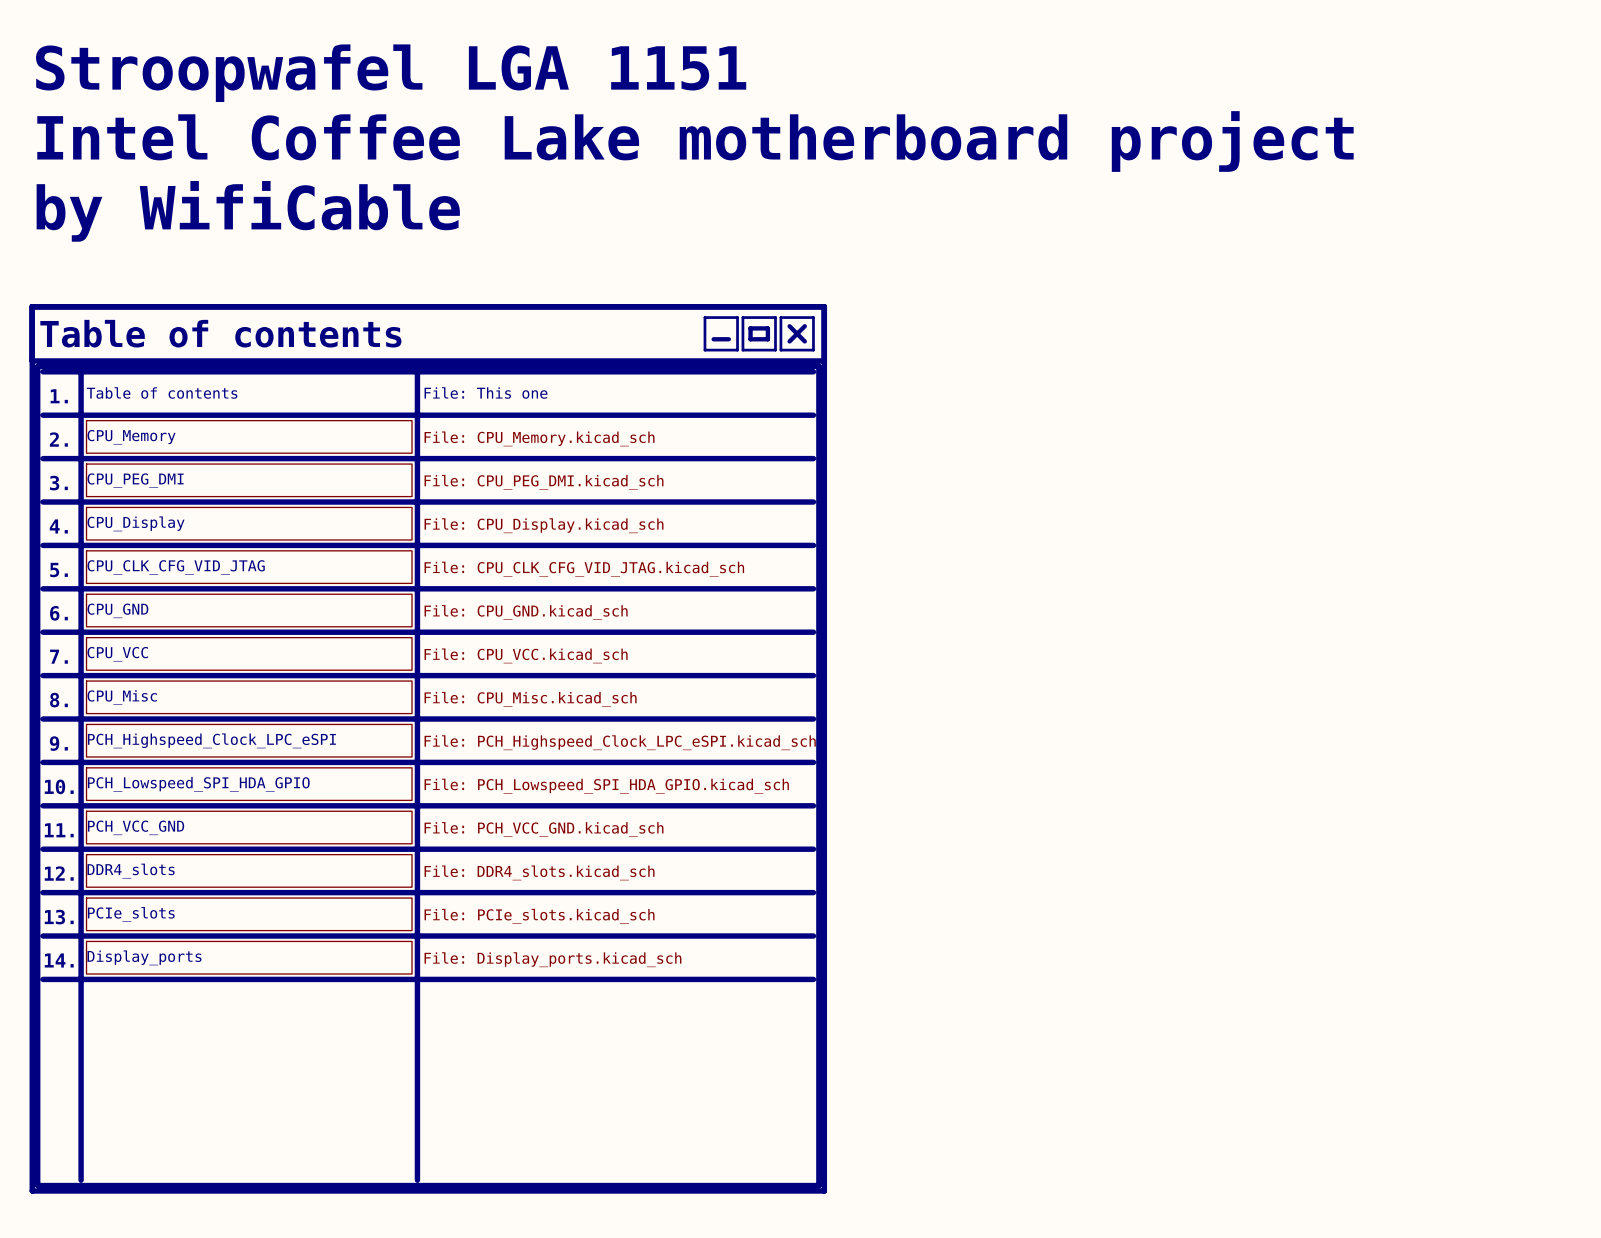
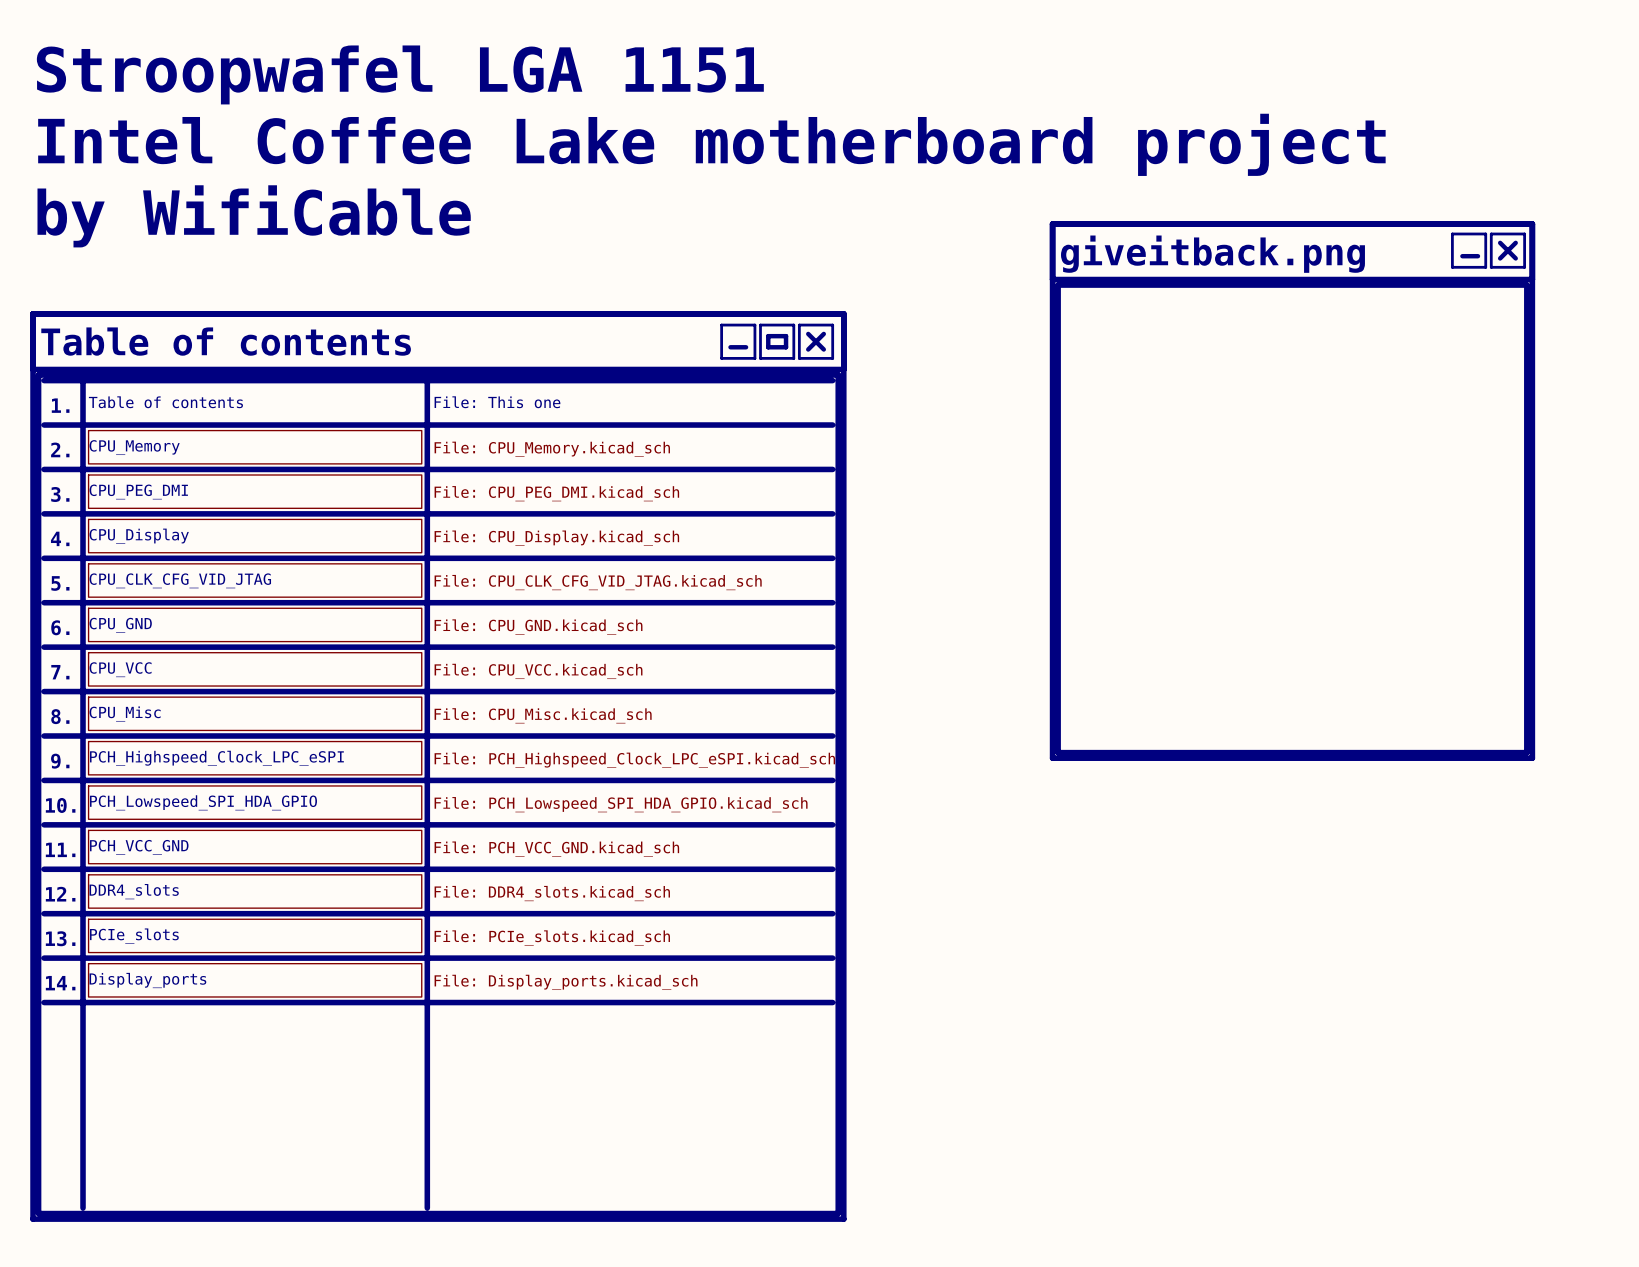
line: none -> (1052, 223) (1532, 223) (1532, 758) (1052, 758) (1052, 223)
line: none -> (1452, 233) (1485, 233) (1485, 267) (1452, 267) (1452, 233)
line: none -> (1491, 233) (1524, 233) (1524, 267) (1491, 267) (1491, 233)
line: none -> (1500, 242) (1515, 258)
line: none -> (1515, 242) (1500, 258)
text: none -> giveitback.png (1212, 254)
line: none -> (1462, 256) (1477, 256)
line: none -> (1052, 279) (1532, 279)
line: none -> (1058, 285) (1526, 285) (1526, 752) (1058, 752) (1058, 285)

